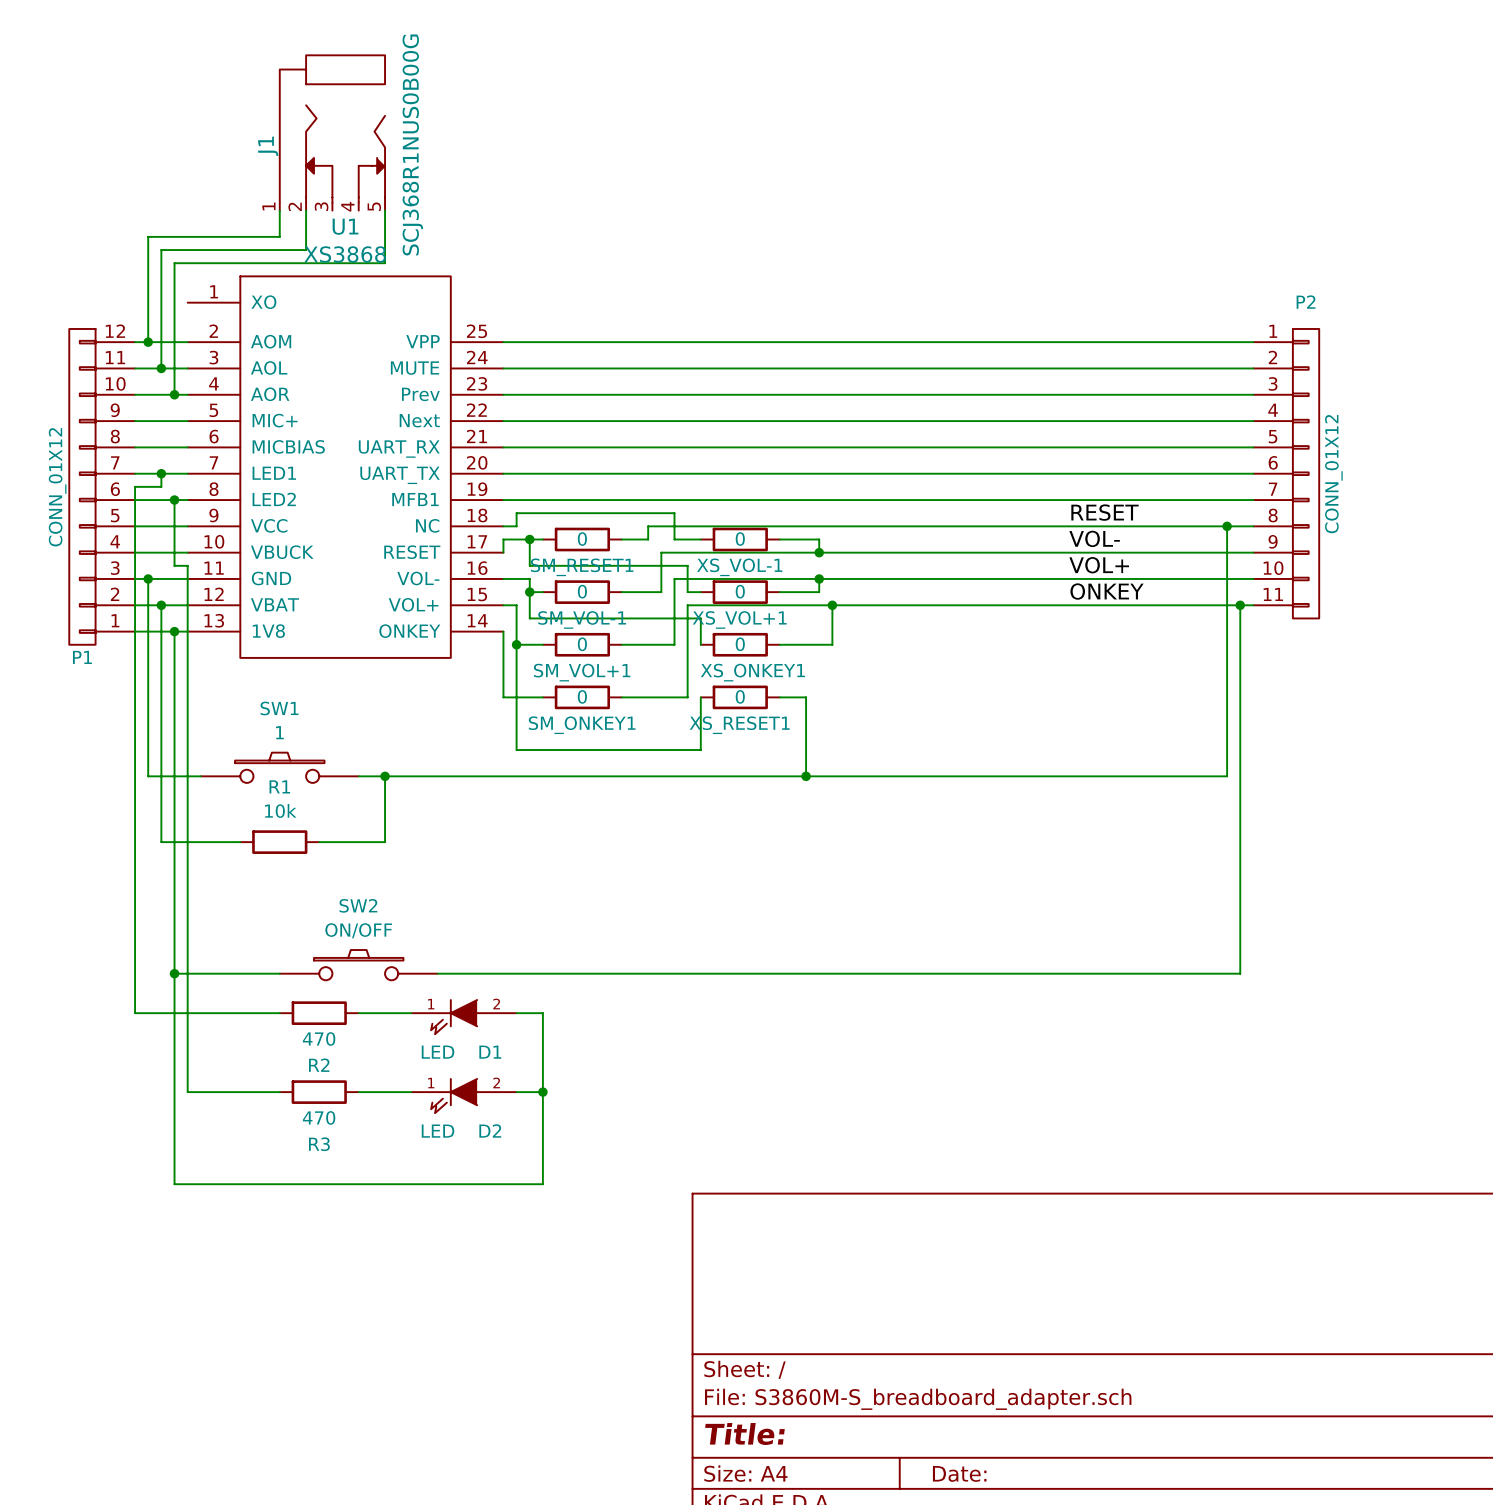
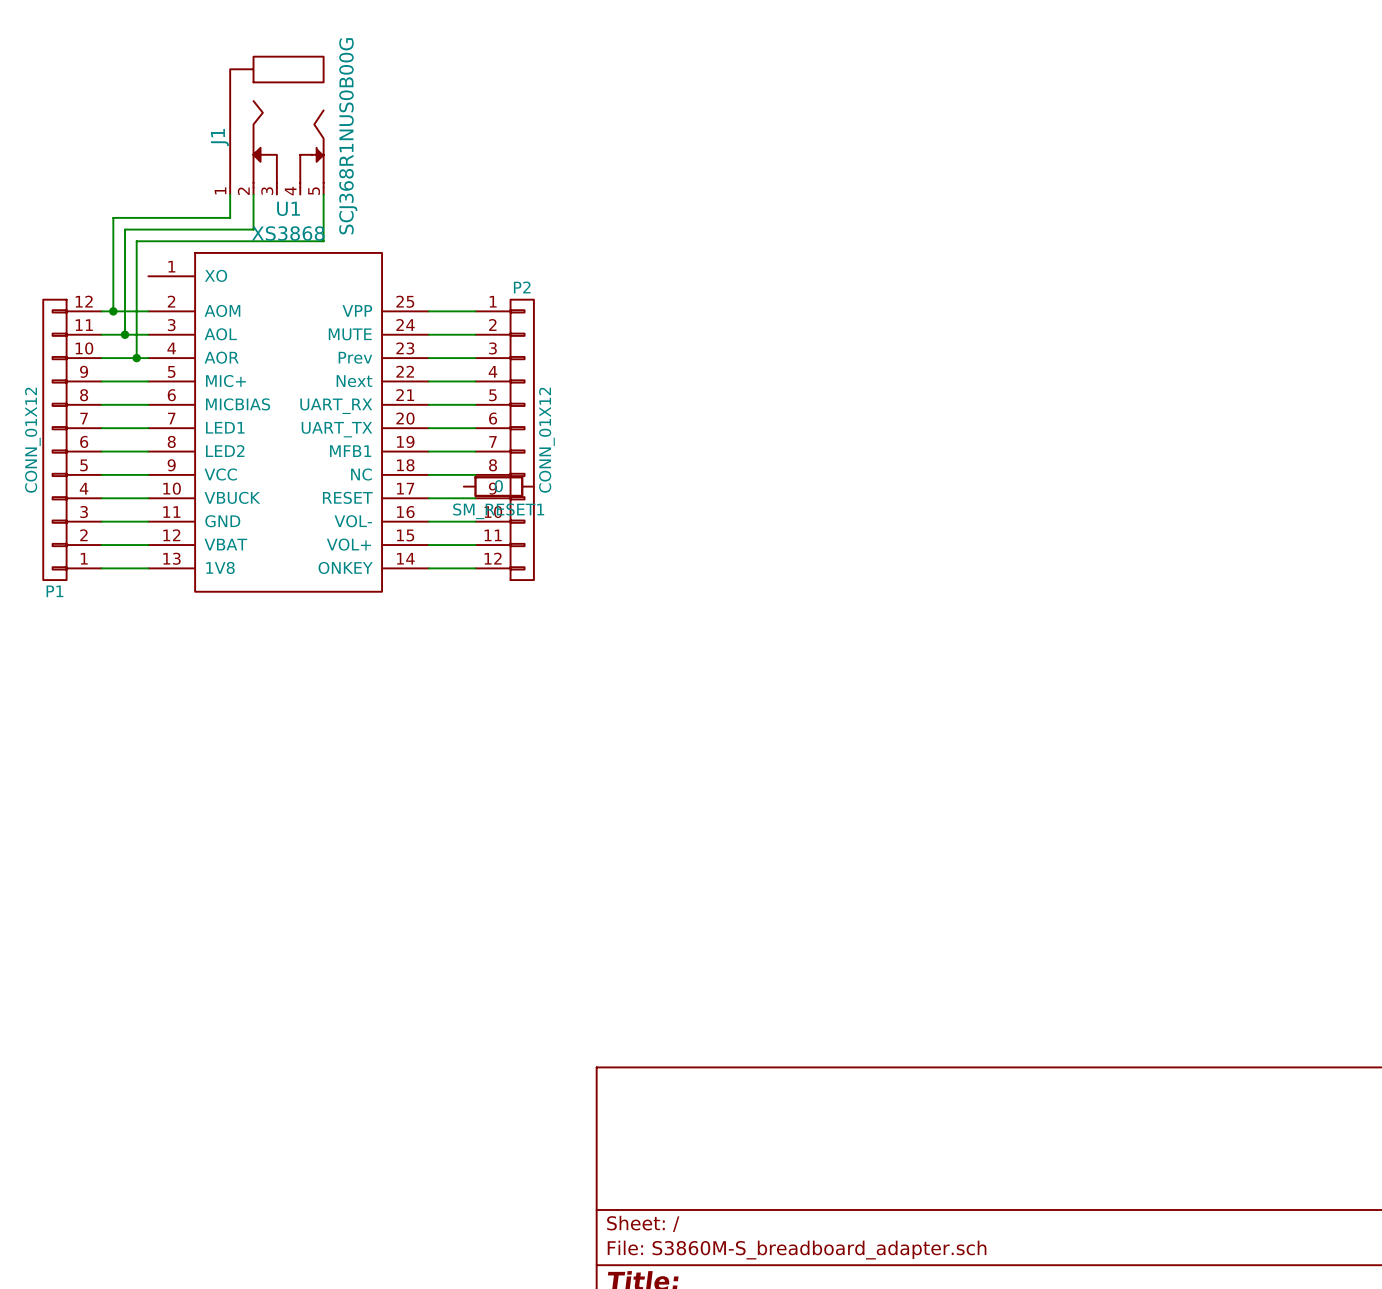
P2 symbol: [1253, 328, 1320, 619] -> [475, 299, 534, 581]
wire: (556, 342) (1253, 342) -> none
wire: (556, 368) (1253, 368) -> none
wire: (556, 394) (1253, 394) -> none
wire: (556, 421) (1253, 421) -> none
wire: (556, 447) (1253, 447) -> none
wire: (161, 473) (161, 486) (135, 486) (135, 1013) (279, 1013) -> none
junction: (161, 473) -> none
wire: (556, 473) (1253, 473) -> none
wire: (174, 500) (174, 565) (187, 565) (187, 1092) (279, 1092) -> none
junction: (174, 500) -> none
wire: (556, 500) (1253, 500) -> none
label: RESET (1105, 512) -> none
wire: (516, 526) (516, 513) (674, 513) (674, 539) (700, 539) -> (440, 474) (475, 474)
wire: (1227, 526) (1227, 776) (358, 776) -> none
junction: (1227, 526) -> none
wire: (1253, 526) (648, 526) (648, 539) (621, 539) -> none
label: VOL- (1094, 538) -> none
wire: (529, 539) (529, 565) (687, 565) (687, 592) (700, 592) -> none
junction: (529, 539) -> none
wire: (542, 539) (503, 539) (503, 552) -> (475, 498) (428, 498)
XS_VOL-1: 0 (740, 539) -> none
wire: (779, 539) (819, 539) (819, 552) -> none
junction: (819, 552) -> none
wire: (1253, 552) (661, 552) (661, 592) (621, 592) -> none
label: VOL+ (1099, 565) -> none
wire: (148, 578) (148, 776) (200, 776) -> none
junction: (148, 578) -> none
wire: (529, 578) (529, 618) (700, 618) (700, 644) -> (452, 521) (475, 521)
wire: (819, 578) (819, 592) (779, 592) -> none
junction: (819, 578) -> none
wire: (1253, 578) (674, 578) (674, 644) (621, 644) -> none
label: ONKEY (1107, 591) -> none
wire: (529, 592) (542, 592) -> none
junction: (529, 592) -> none
SM_VOL-1: 0 (582, 592) -> none
XS_VOL+1: 0 (740, 592) -> none
wire: (161, 605) (161, 842) (240, 842) -> none
junction: (161, 605) -> none
wire: (516, 605) (516, 750) (700, 750) (700, 697) -> (440, 545) (475, 545)
wire: (832, 605) (832, 644) (779, 644) -> none
junction: (832, 605) -> none
wire: (1240, 605) (1240, 973) (437, 973) -> none
junction: (1240, 605) -> none
wire: (1253, 605) (687, 605) (687, 697) (621, 697) -> none
wire: (174, 631) (174, 1184) (542, 1184) (542, 1013) (516, 1013) -> none
junction: (174, 631) -> none
wire: (503, 631) (503, 697) (542, 697) -> (428, 568) (475, 568)
wire: (516, 644) (542, 644) -> none
junction: (516, 644) -> none
SM_VOL+1: 0 (582, 644) -> none
XS_ONKEY1: 0 (740, 644) -> none
SM_ONKEY1: 0 (582, 697) -> none
XS_RESET1: 0 (740, 697) -> none
wire: (779, 697) (806, 697) (806, 776) -> none
SW1: 1 (279, 767) -> none
wire: (385, 776) (385, 842) (319, 842) -> none
junction: (385, 776) -> none
junction: (806, 776) -> none
R1: 10k (279, 842) -> none
SW2: ON/OFF (358, 965) -> none
wire: (174, 973) (279, 973) -> none
junction: (174, 973) -> none
R2: 470 (319, 1013) -> none
wire: (358, 1013) (411, 1013) -> none
D1: LED (463, 1017) -> none
R3: 470 (319, 1092) -> none
wire: (358, 1092) (411, 1092) -> none
wire: (516, 1092) (542, 1092) -> none
junction: (542, 1092) -> none
D2: LED (463, 1096) -> none

